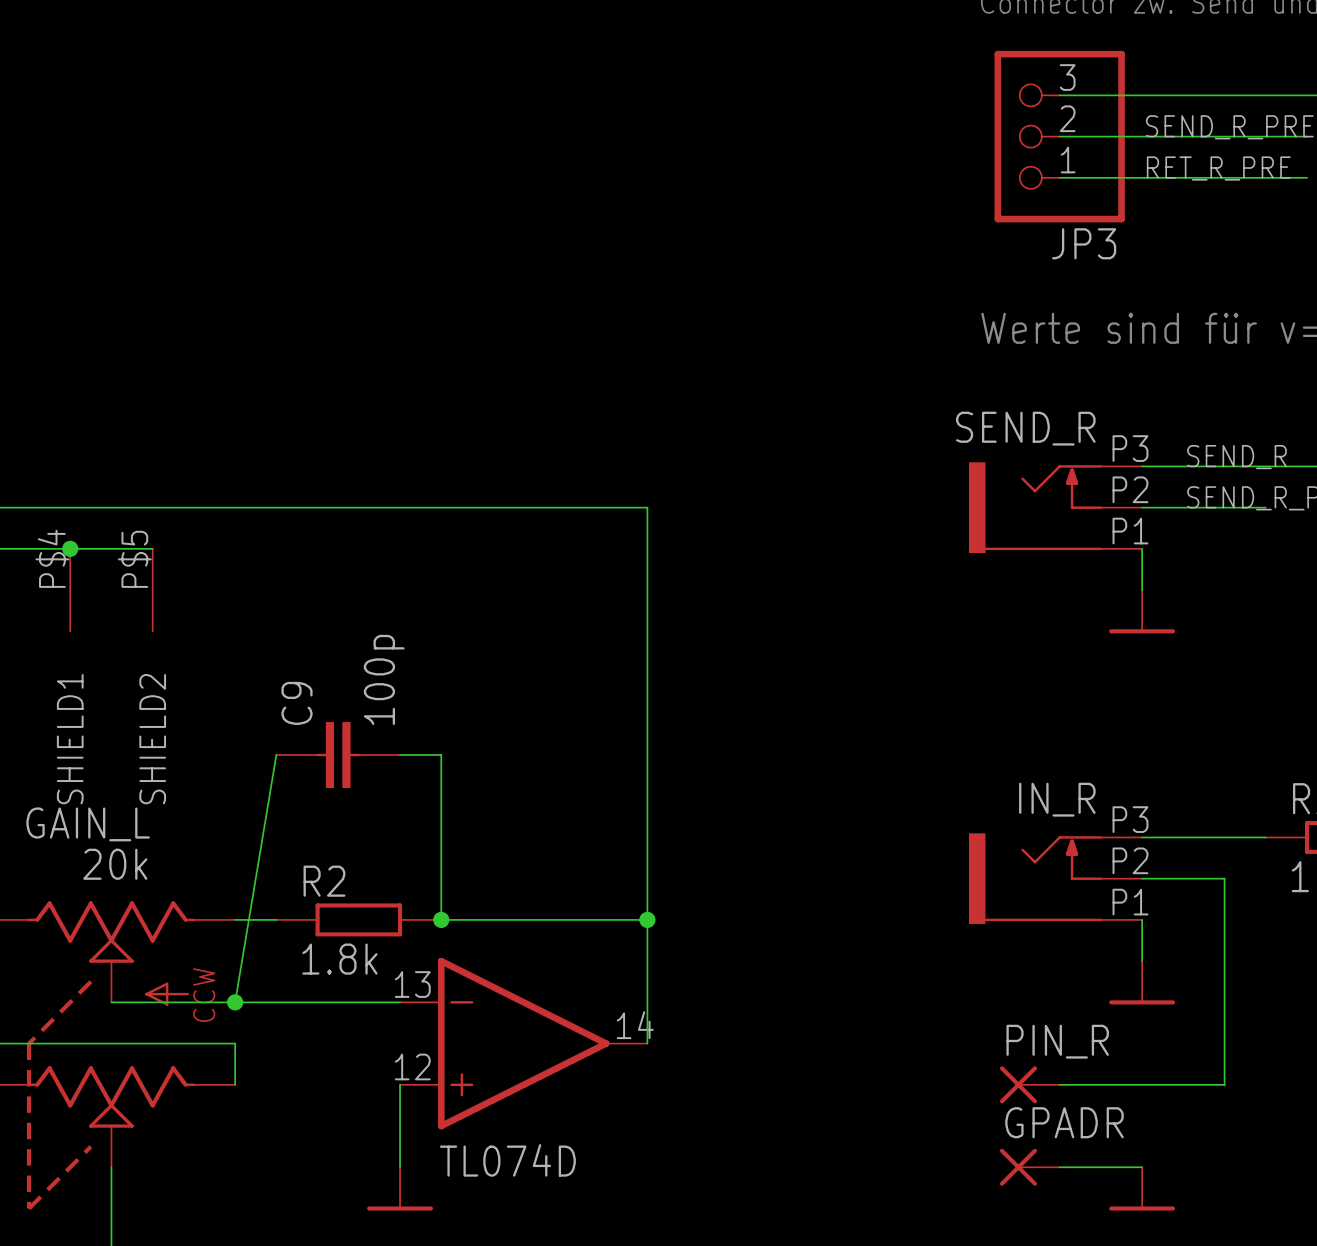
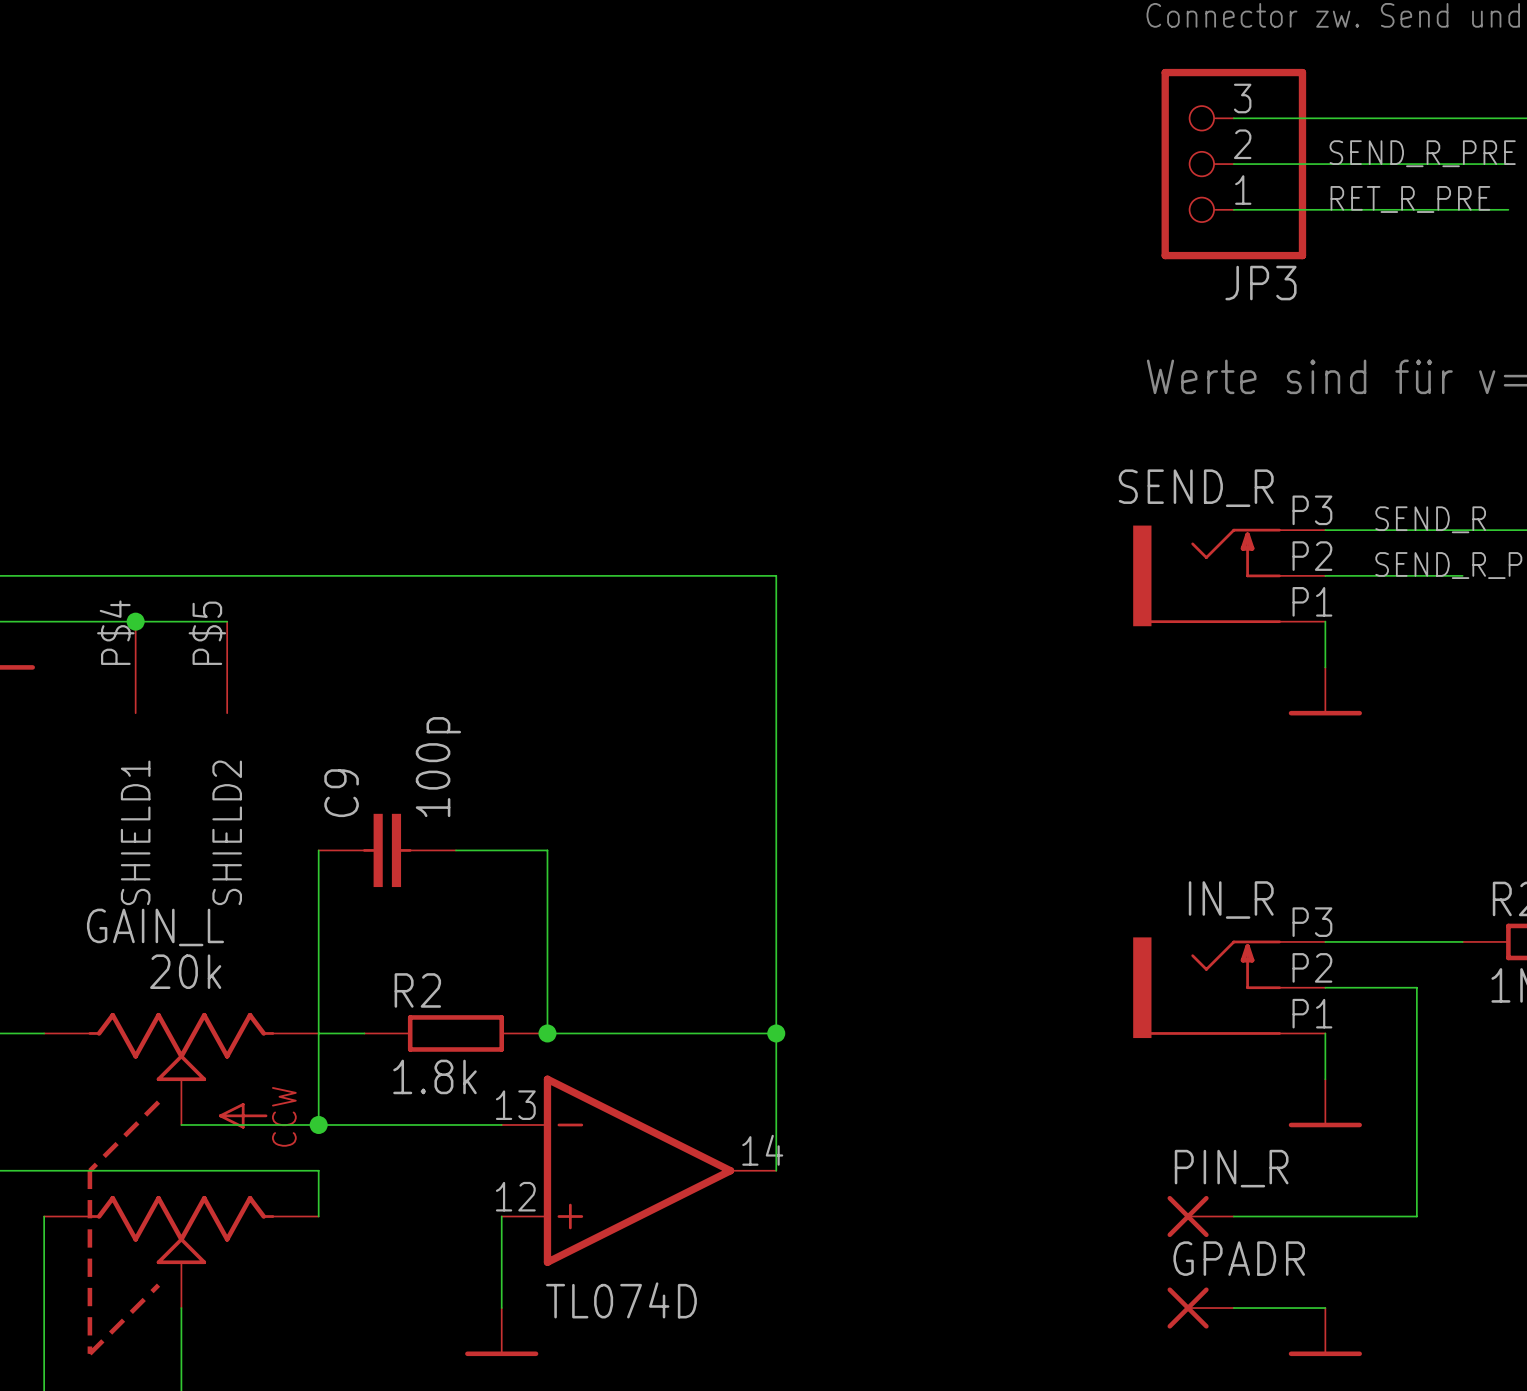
wire: (276, 755) (235, 1002) -> (318, 850) (318, 1124)
C9 position: (338, 755) -> (387, 850)

